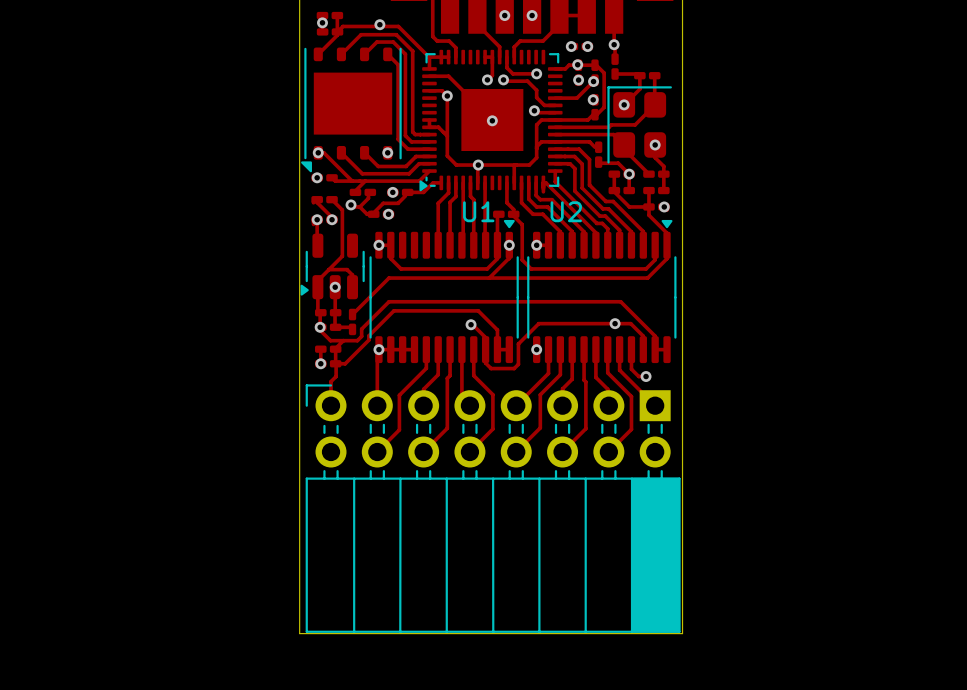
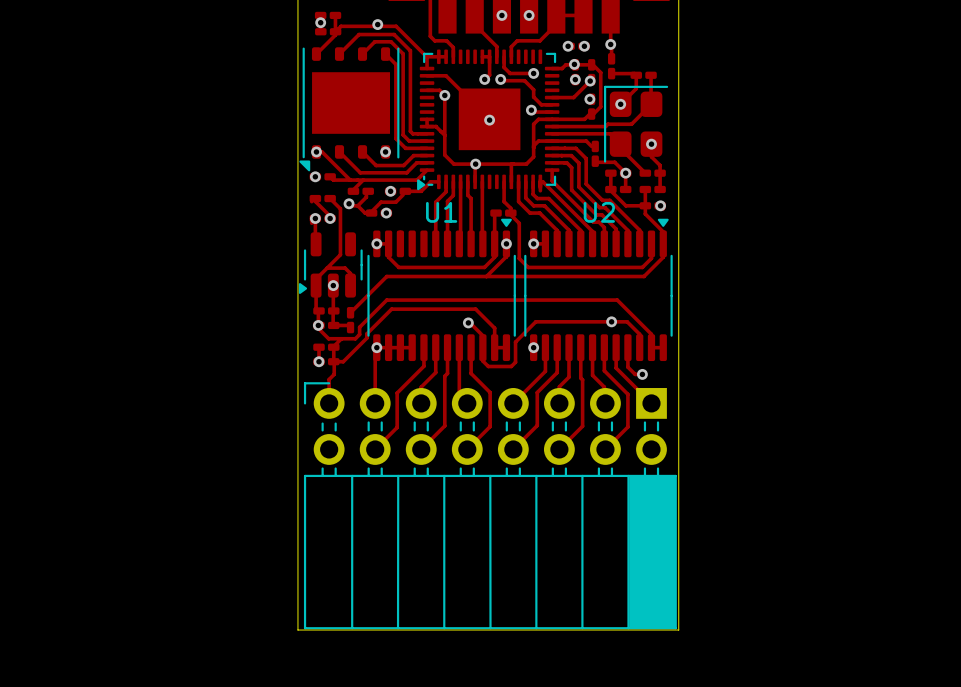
U1 name position: U1 (478, 211) -> U1 (441, 212)
U2 name position: U2 (566, 211) -> U2 (599, 212)

